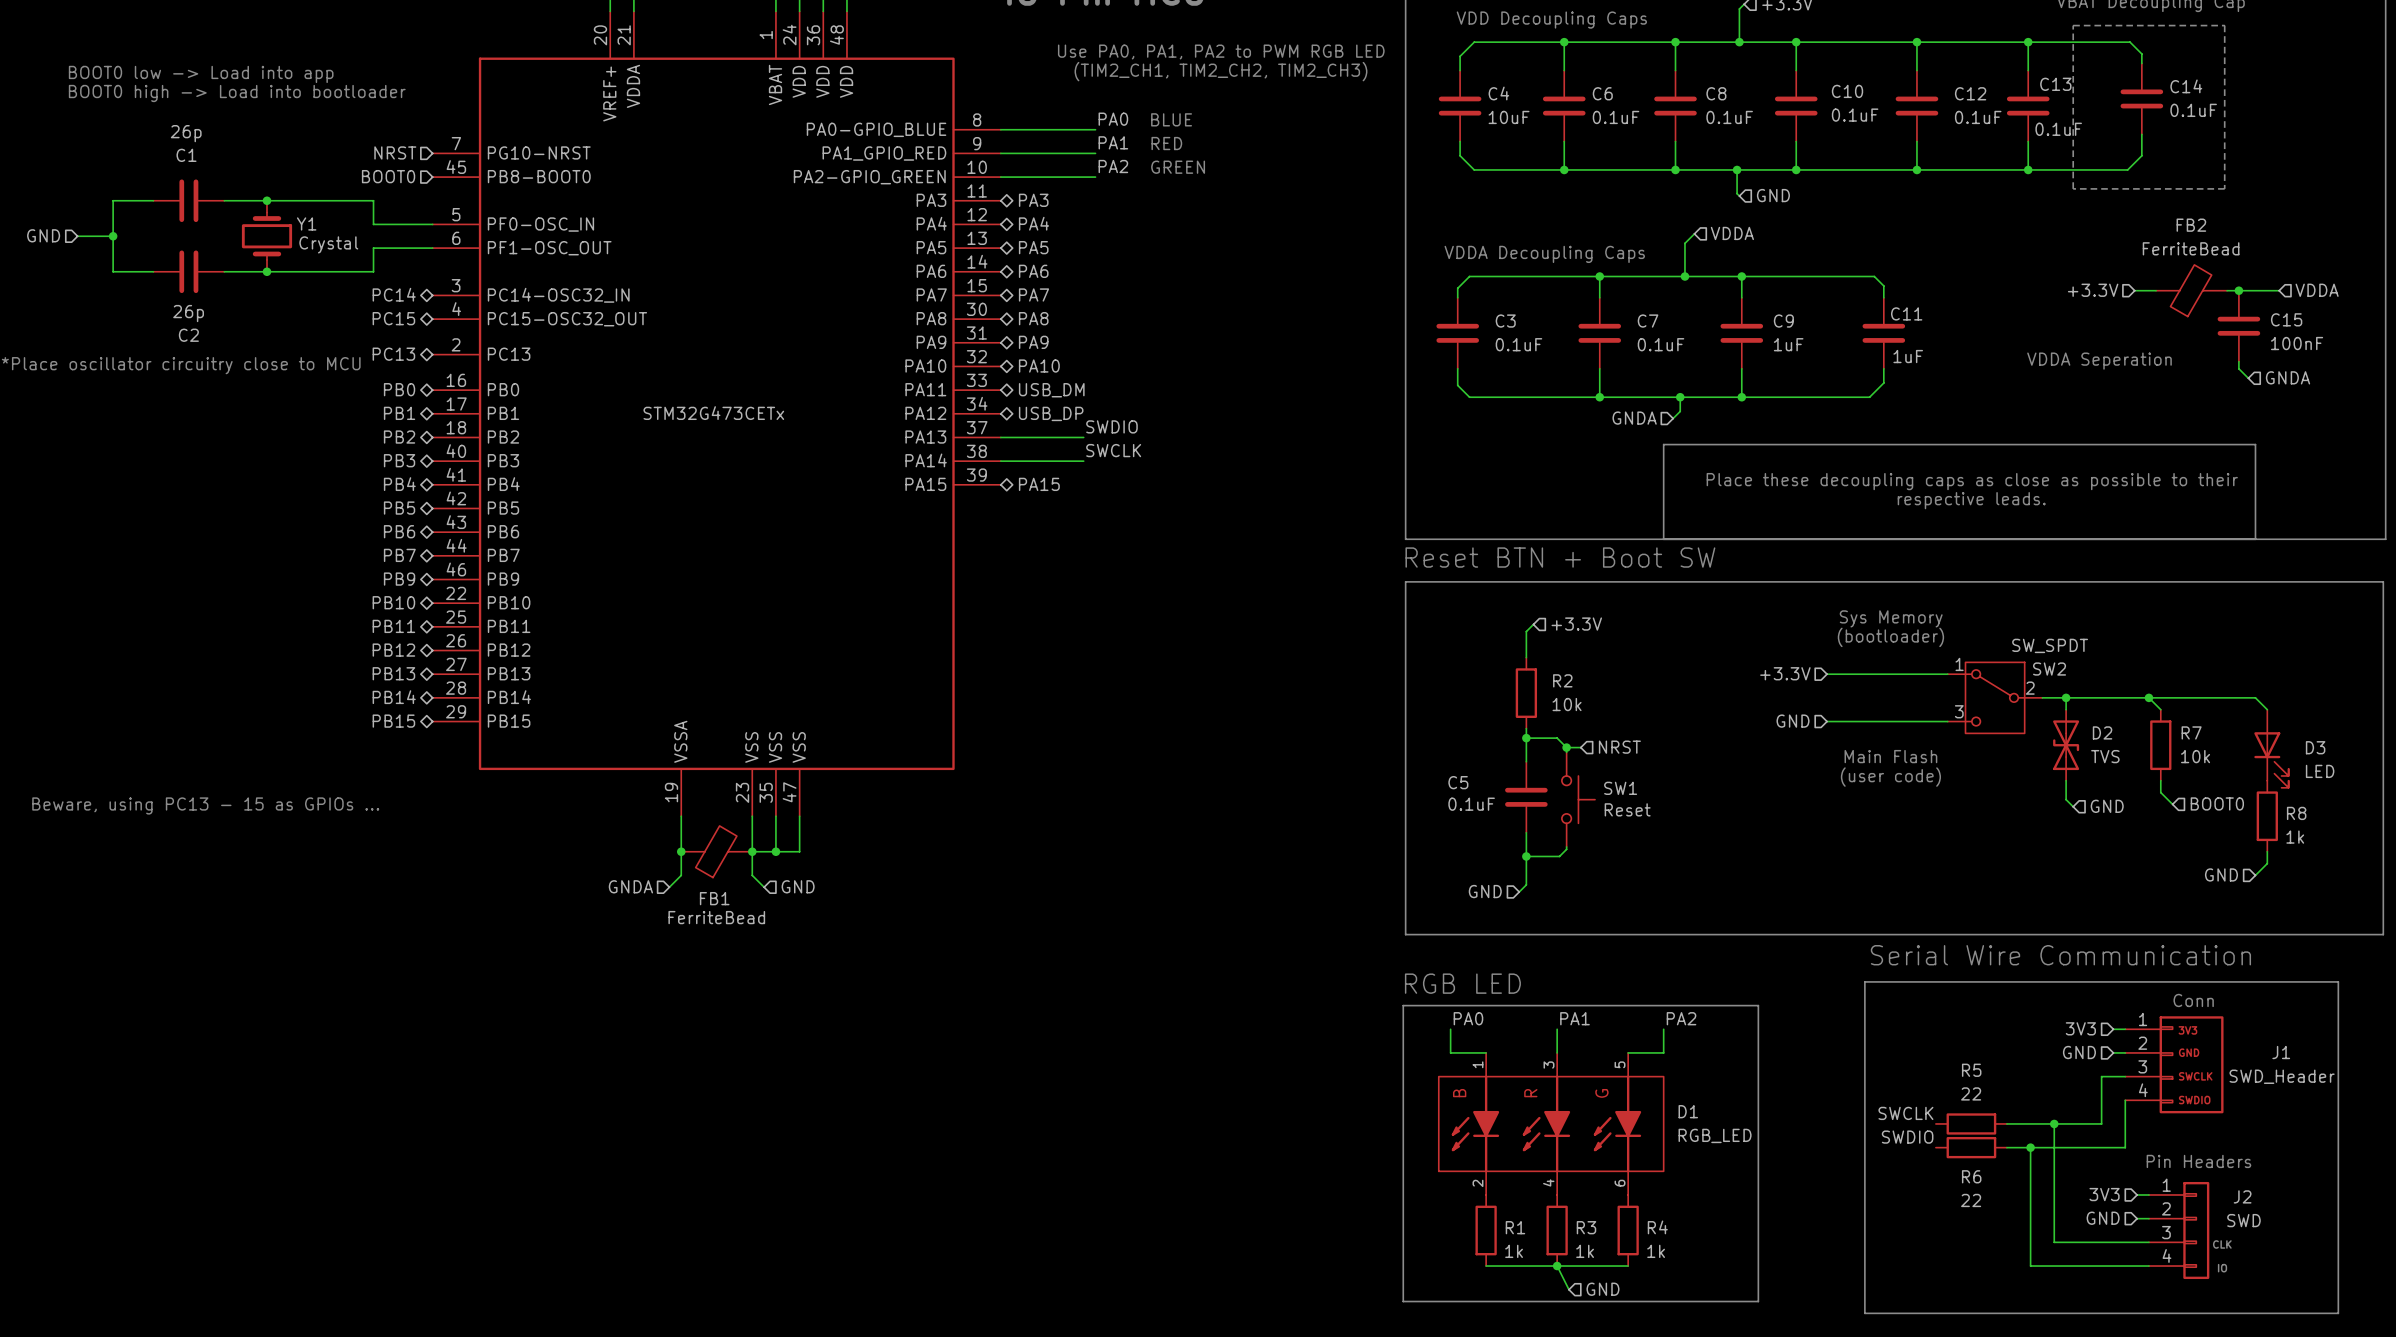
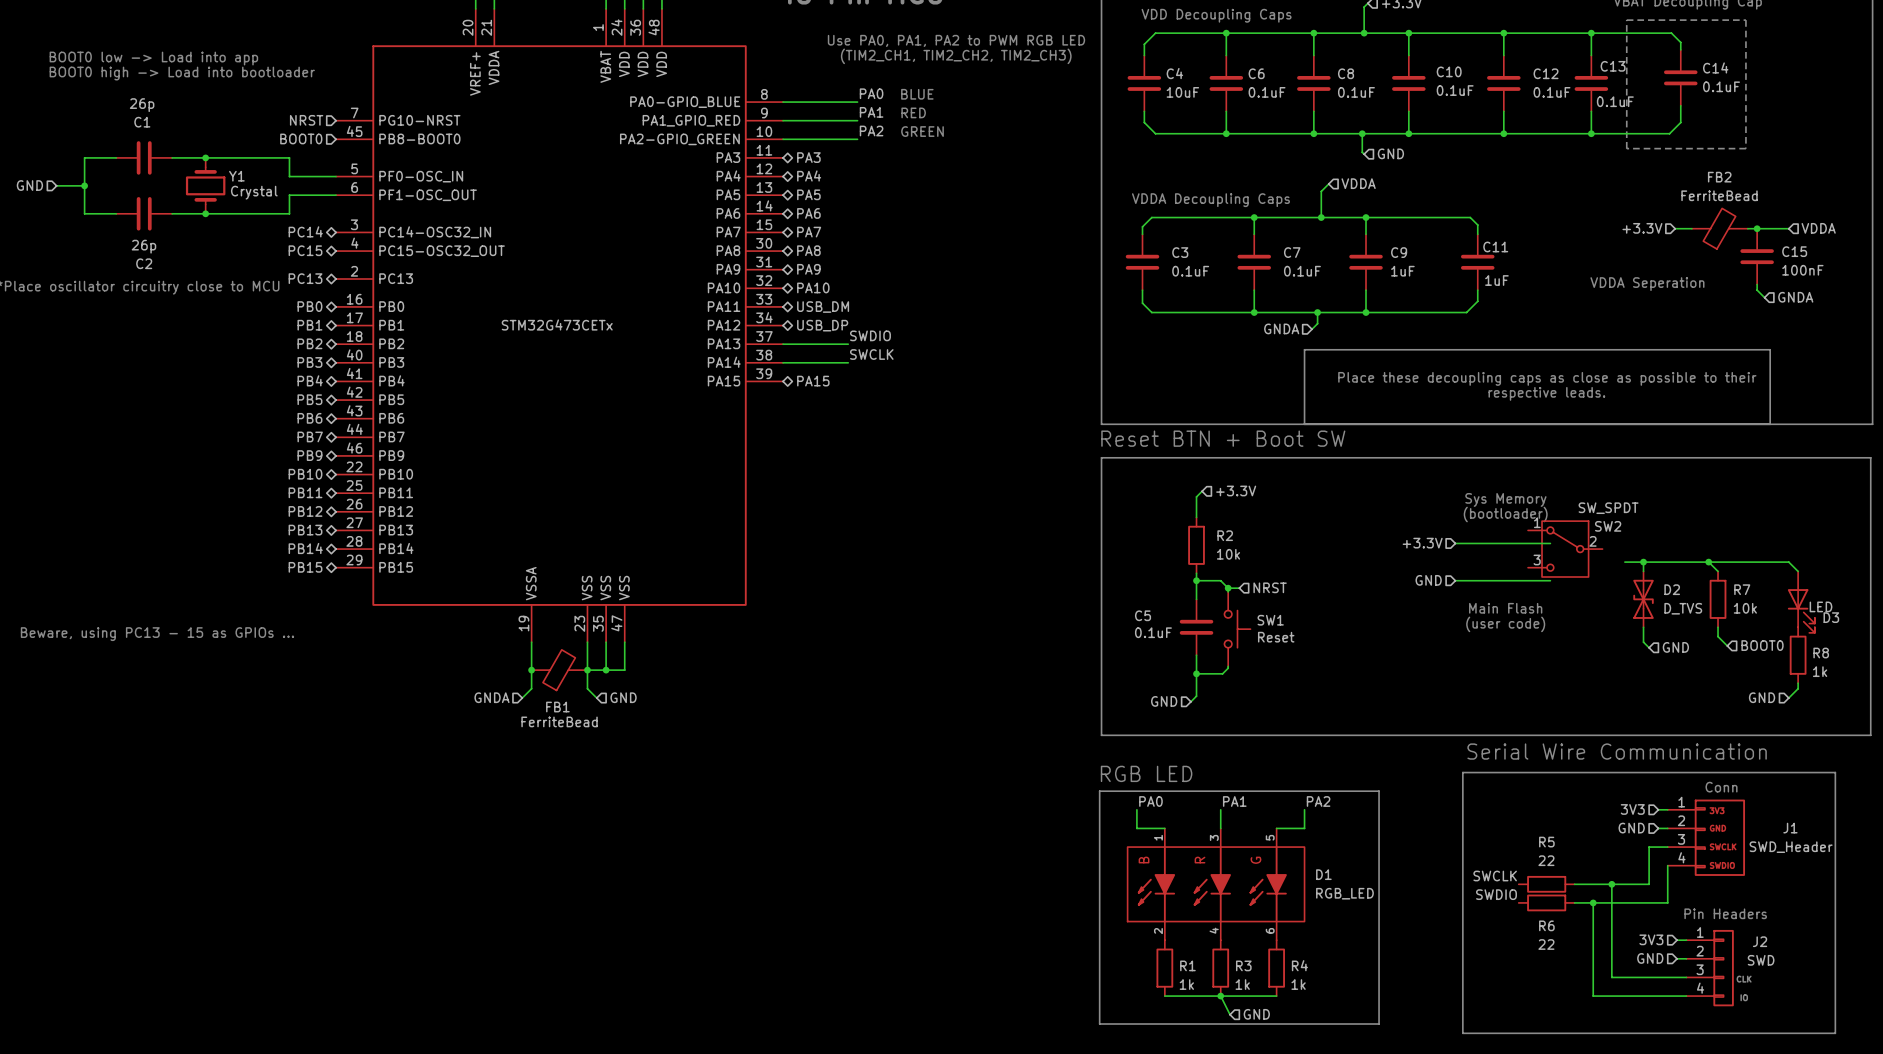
text position: Sys Memory (1891, 618) -> Sys Memory (1505, 499)
text position: (bootloader) (1890, 637) -> (bootloader) (1505, 514)
hierarchical label position: +3.3V (1785, 673) -> +3.3V (1422, 543)
wire: (1827, 674) (1947, 674) -> (1455, 543) (1550, 543)
wire: (2042, 697) (2255, 697) (2267, 709) -> none
wire: (2066, 697) (2066, 709) -> (1643, 562) (1643, 571)
junction: (2066, 697) -> none
wire: (2148, 697) (2160, 709) -> (1708, 562) (1718, 571)
junction: (2148, 697) -> none
wire: none -> (1624, 562) (1788, 562) (1798, 571)
junction: none -> (1643, 562)
junction: none -> (1708, 562)
hierarchical label position: GND (1793, 721) -> GND (1428, 580)
wire: (1827, 721) (1947, 721) -> (1455, 580) (1550, 580)
D2 position: (2066, 745) -> (1643, 599)
R7 position: (2160, 745) -> (1718, 599)
D3 name position: D3 (2315, 747) -> D3 (1831, 617)
D3 position: (2271, 748) -> (1801, 602)
text position: Main Flash (1890, 756) -> Main Flash (1505, 608)
D2 value: TVS (2105, 756) -> D_TVS (1683, 608)
text position: (user code) (1890, 777) -> (user code) (1505, 624)
wire: (2066, 780) (2066, 799) (2073, 806) -> (1643, 627) (1643, 642) (1649, 647)
wire: (2160, 780) (2160, 792) (2172, 804) -> (1718, 627) (1718, 636) (1727, 645)
hierarchical label position: BOOT0 (2217, 803) -> BOOT0 (1762, 645)
hierarchical label position: GND (2107, 806) -> GND (1675, 647)
R8 position: (2267, 816) -> (1798, 655)
wire: (2267, 851) (2267, 863) (2255, 875) -> none
wire: none -> (1798, 683) (1798, 688) (1788, 698)
hierarchical label position: GND (2221, 874) -> GND (1762, 697)

